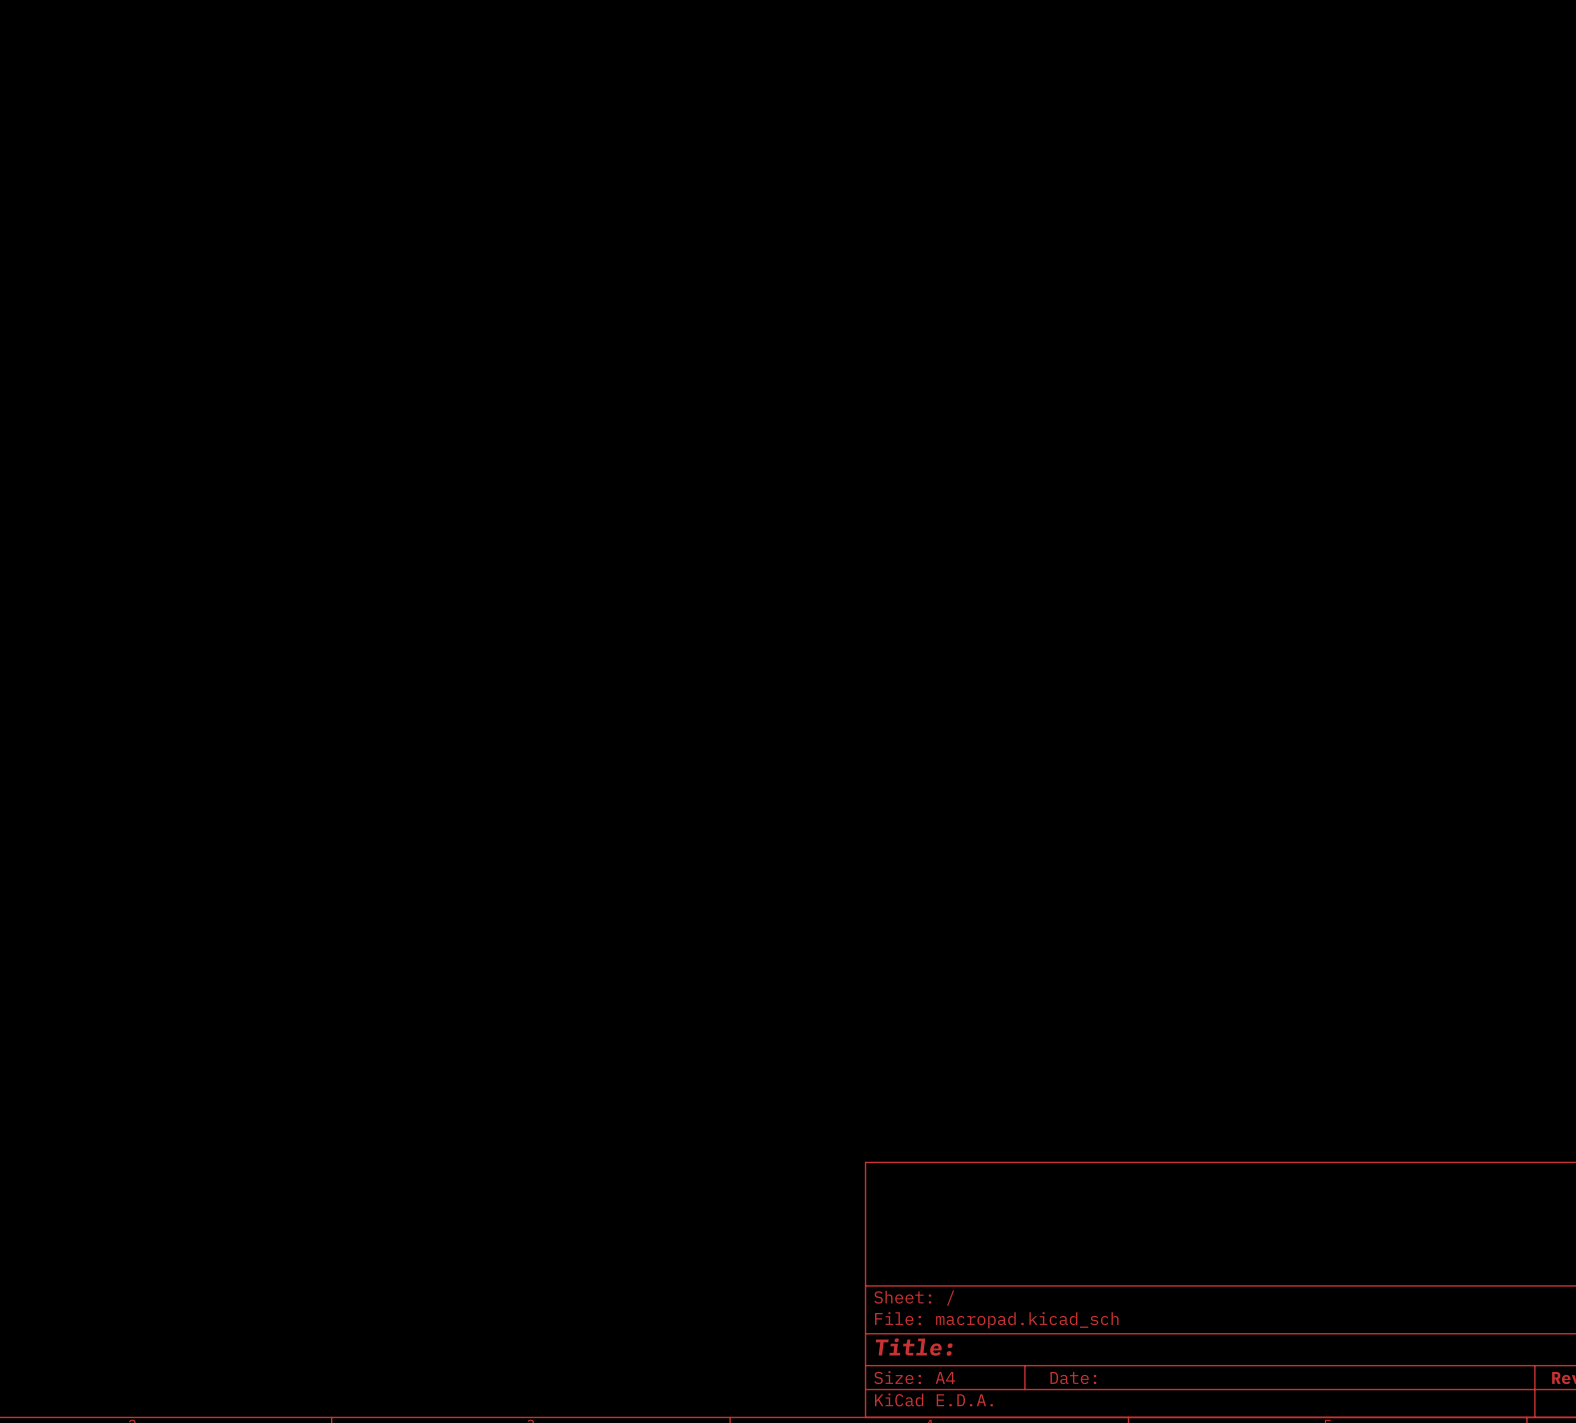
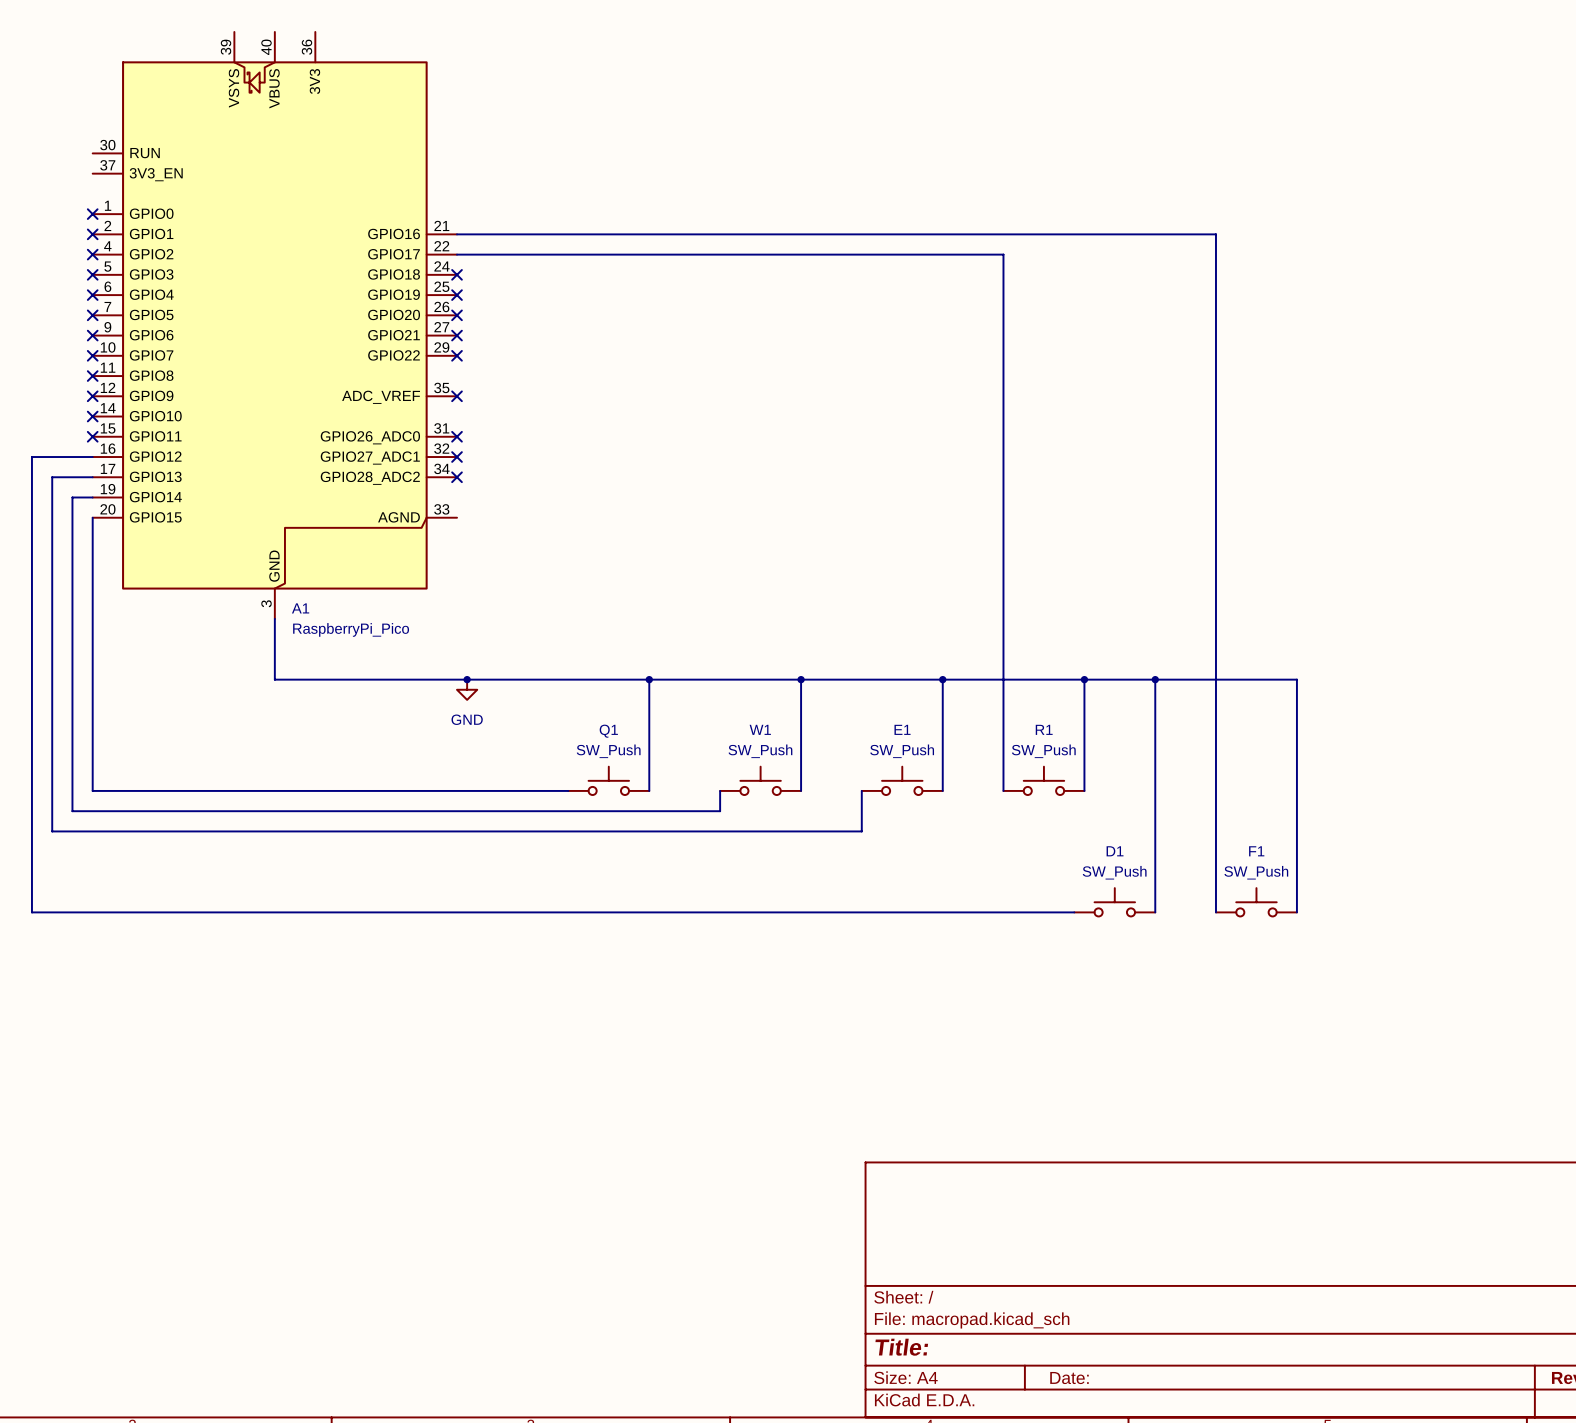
no-connect mark: none -> (92, 214)
no-connect mark: none -> (92, 234)
wire: none -> (457, 234) (1215, 234) (1215, 912)
no-connect mark: none -> (92, 254)
wire: none -> (457, 254) (1003, 254) (1003, 790)
no-connect mark: none -> (92, 274)
no-connect mark: none -> (457, 274)
no-connect mark: none -> (92, 295)
no-connect mark: none -> (457, 295)
no-connect mark: none -> (92, 315)
no-connect mark: none -> (457, 315)
A1: none -> RaspberryPi_Pico (274, 325)
no-connect mark: none -> (92, 335)
no-connect mark: none -> (457, 335)
no-connect mark: none -> (92, 355)
no-connect mark: none -> (457, 355)
no-connect mark: none -> (92, 376)
no-connect mark: none -> (92, 396)
no-connect mark: none -> (457, 396)
no-connect mark: none -> (92, 416)
no-connect mark: none -> (92, 436)
no-connect mark: none -> (457, 436)
wire: none -> (92, 457) (31, 457) (31, 912) (1074, 912)
no-connect mark: none -> (457, 457)
wire: none -> (92, 477) (52, 477) (52, 831) (861, 831) (861, 790)
no-connect mark: none -> (457, 477)
wire: none -> (92, 497) (72, 497) (72, 811) (720, 811) (720, 790)
wire: none -> (92, 517) (92, 790) (568, 790)
wire: none -> (274, 618) (274, 679) (1296, 679) (1296, 912)
junction: none -> (467, 679)
wire: none -> (649, 679) (649, 790)
junction: none -> (649, 679)
wire: none -> (801, 679) (801, 790)
junction: none -> (801, 679)
wire: none -> (942, 679) (942, 790)
junction: none -> (942, 679)
wire: none -> (1084, 679) (1084, 790)
junction: none -> (1084, 679)
wire: none -> (1155, 679) (1155, 912)
junction: none -> (1155, 679)
power symbol: none -> GND (467, 689)
Q1: none -> SW_Push (608, 780)
W1: none -> SW_Push (760, 780)
E1: none -> SW_Push (902, 780)
R1: none -> SW_Push (1043, 780)
D1: none -> SW_Push (1114, 902)
F1: none -> SW_Push (1256, 902)

